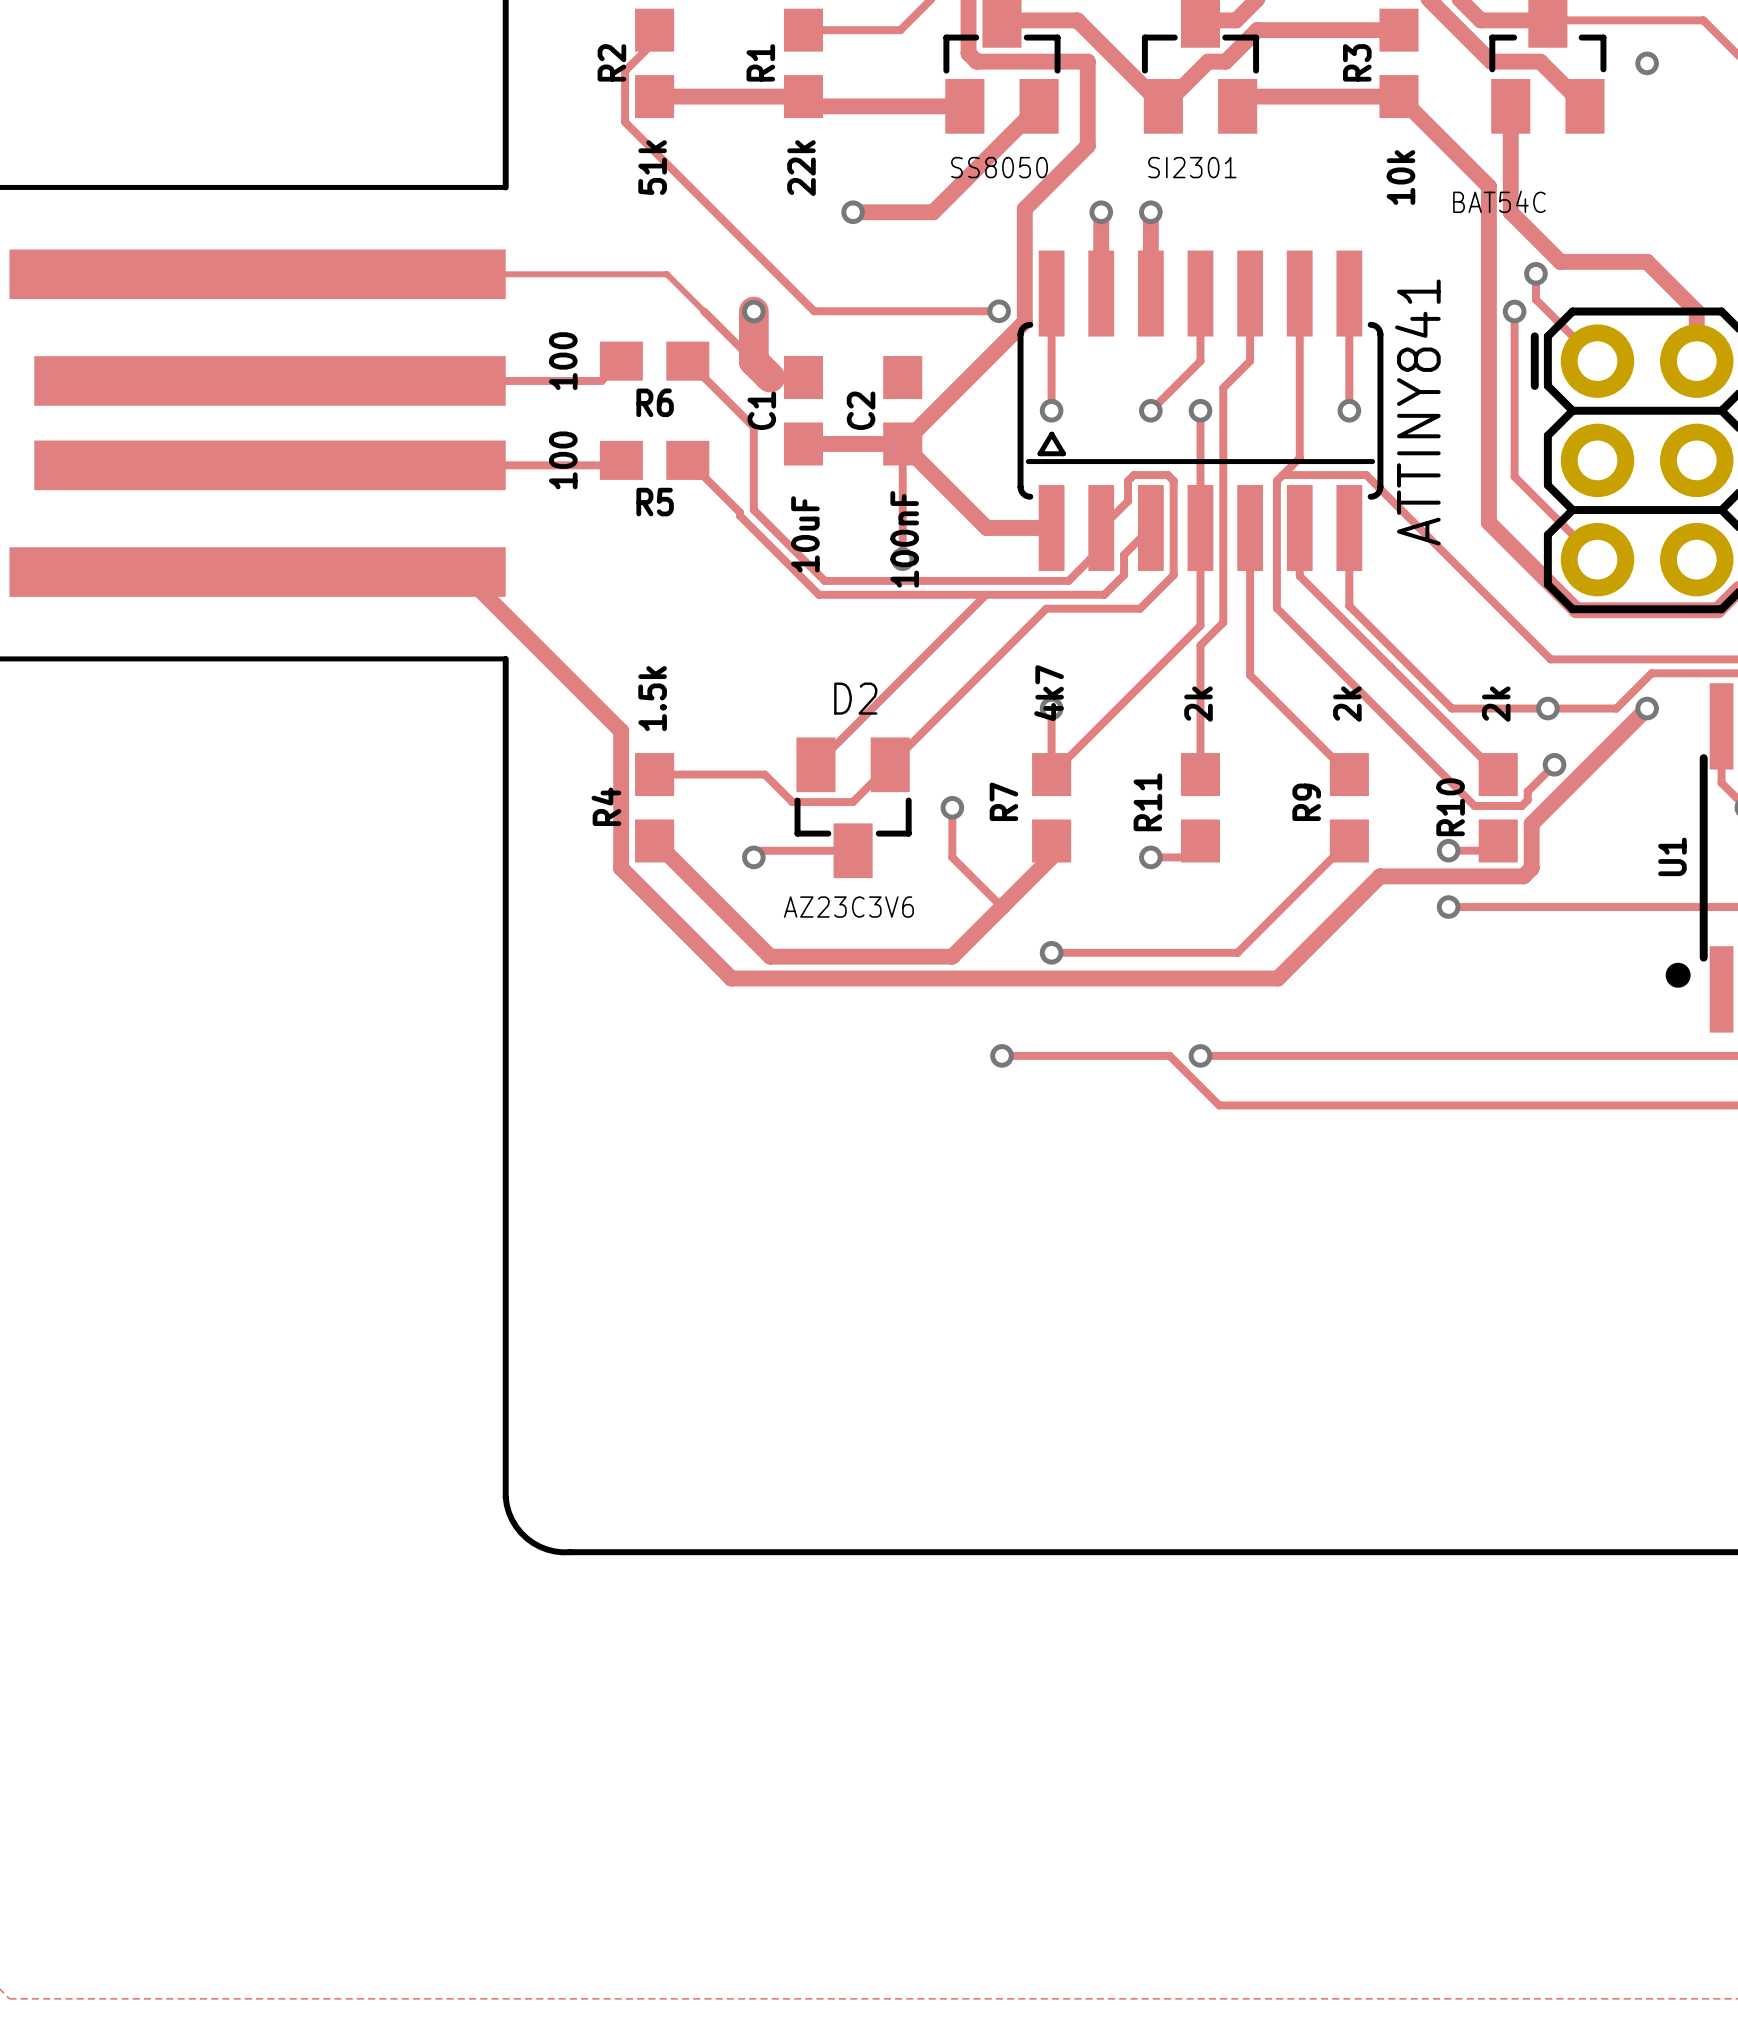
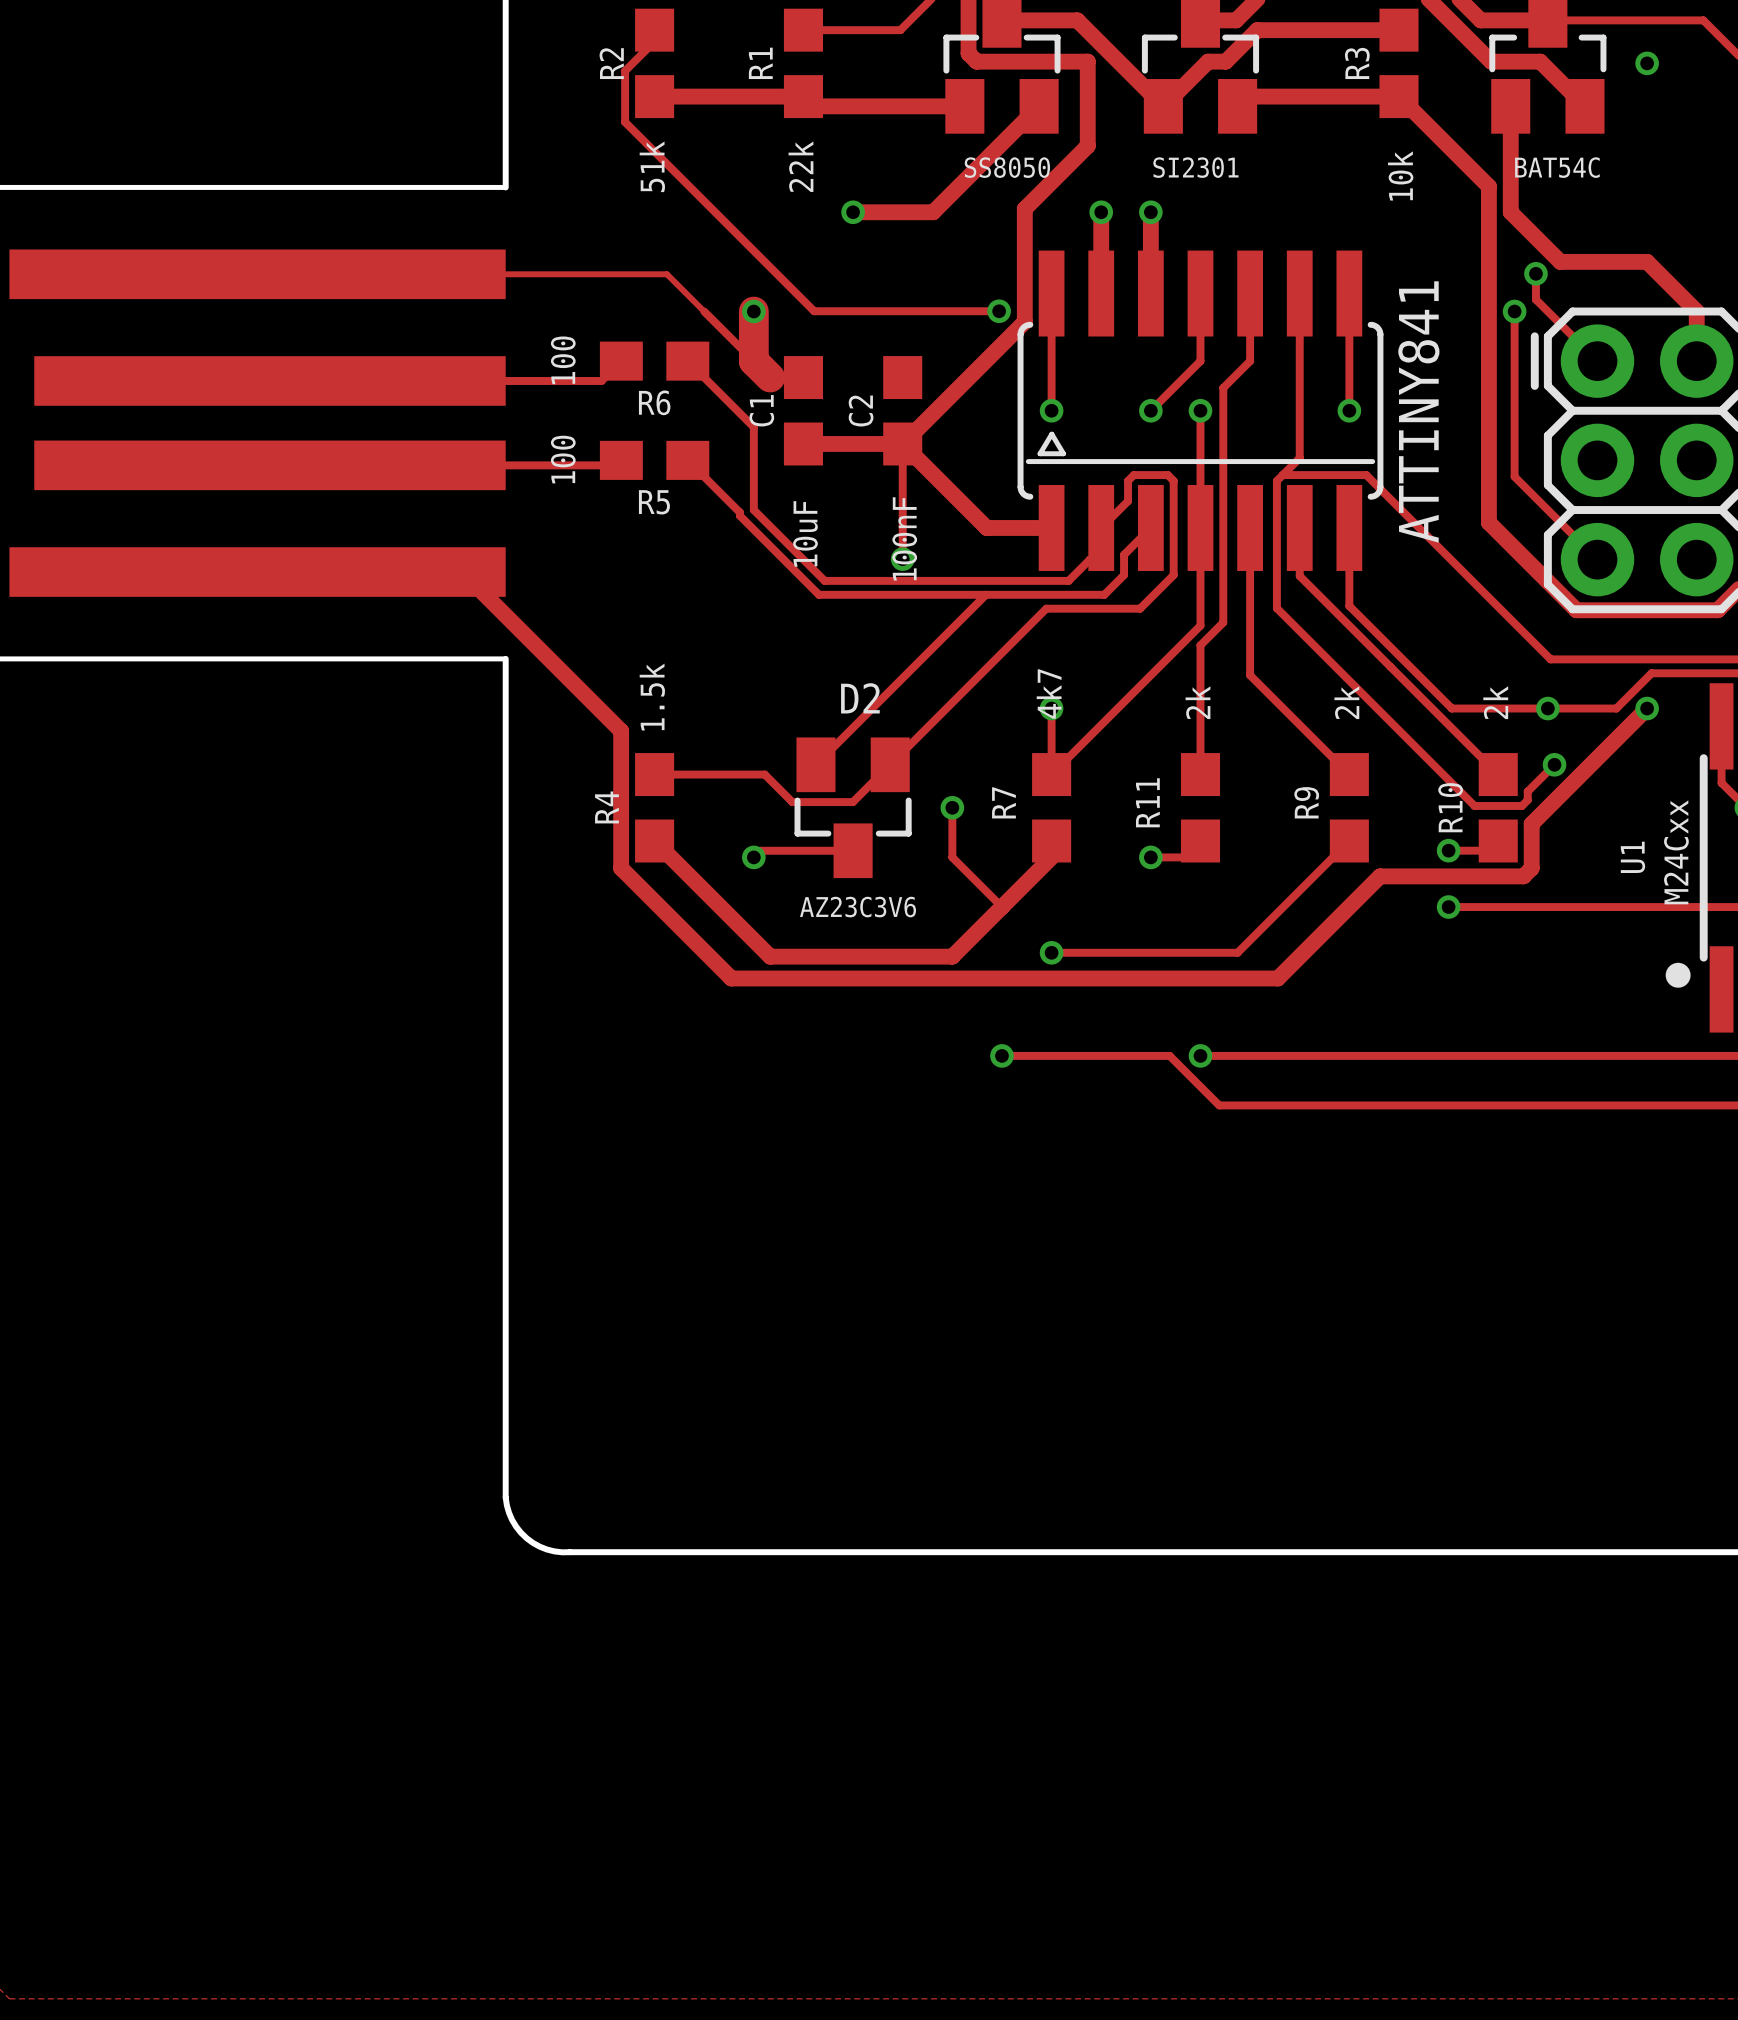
part value position: BAT54C (1499, 201) -> BAT54C (1557, 167)
U1 value: none -> M24Cxx (1676, 852)
U1 name position: U1 (1672, 856) -> U1 (1632, 857)

